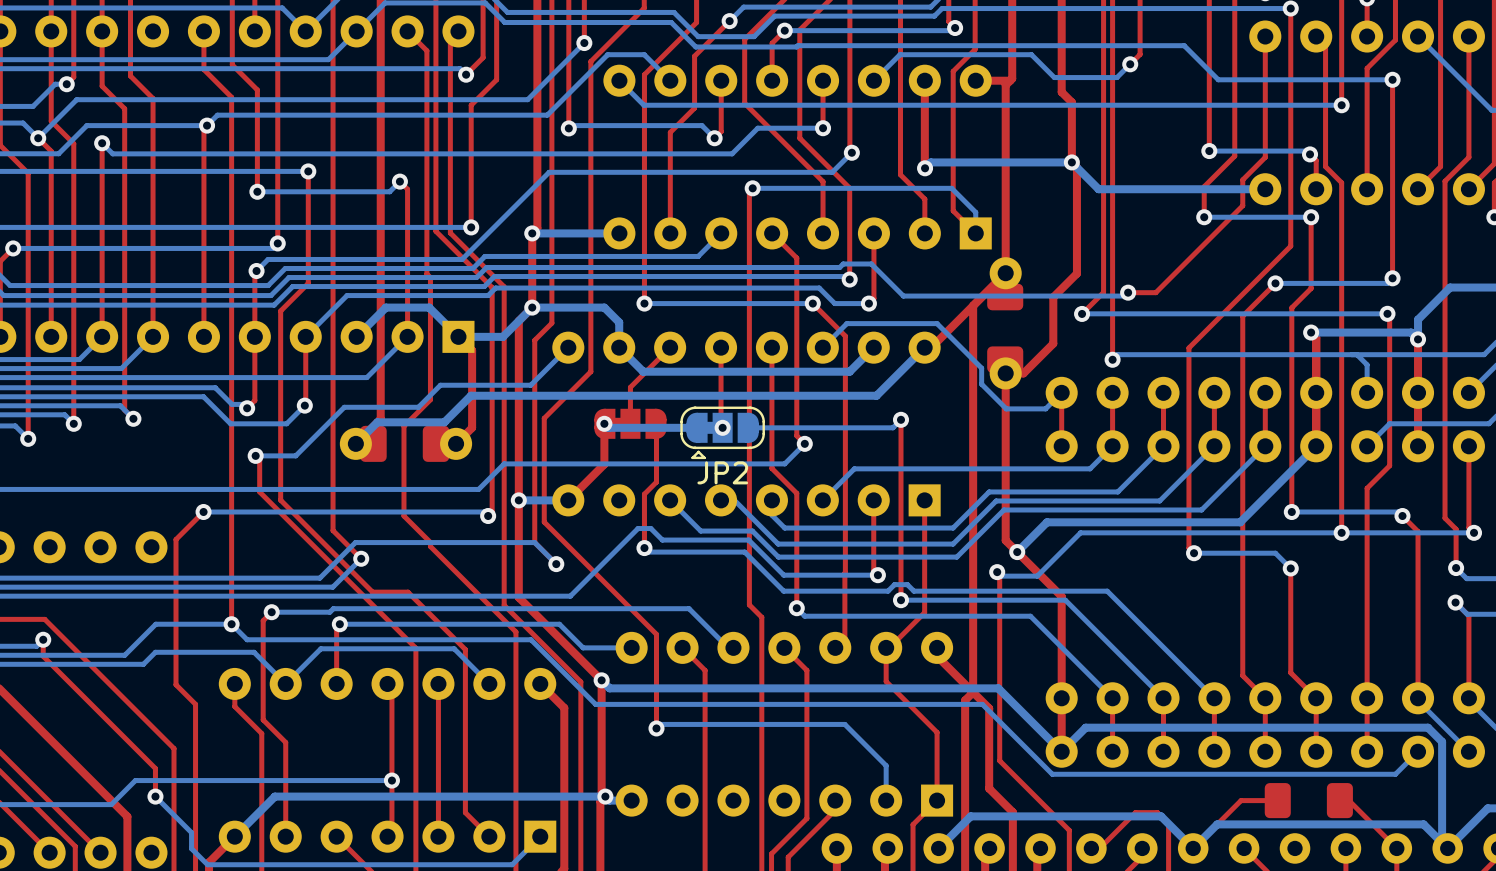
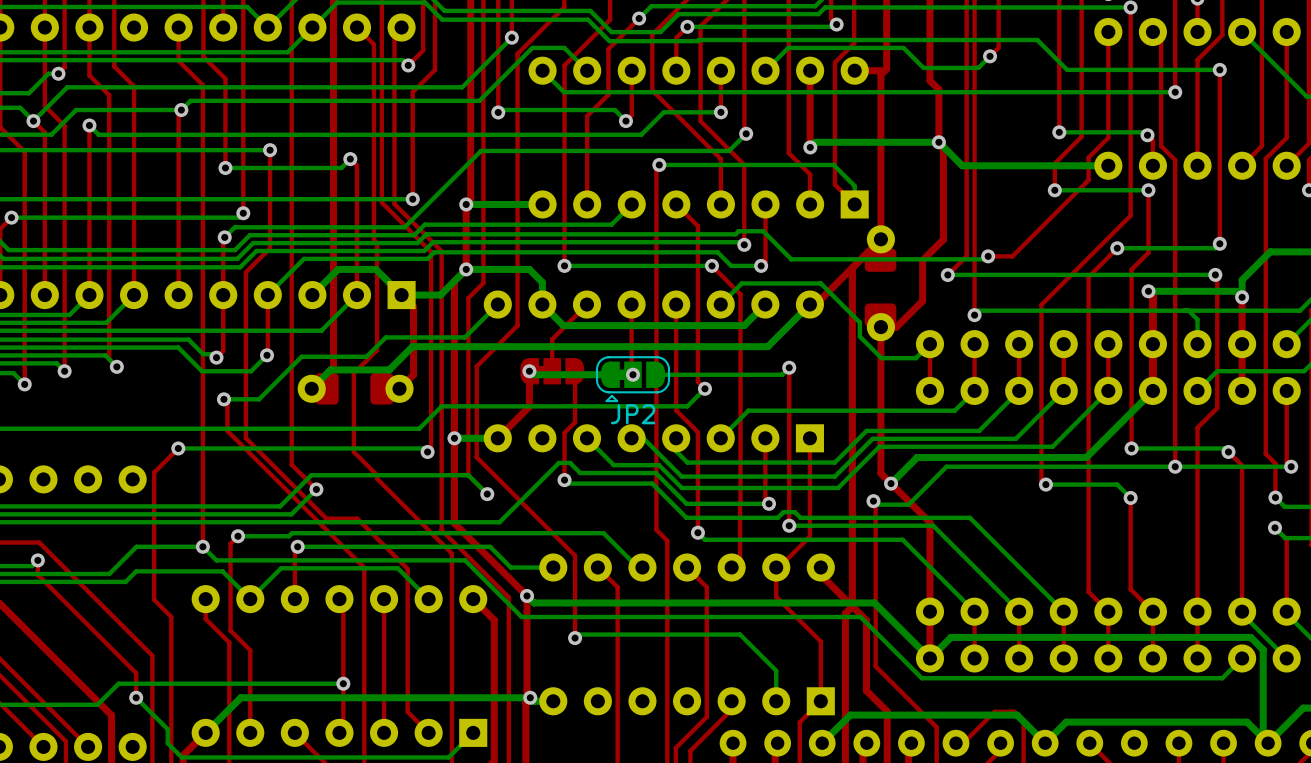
top track: (1277, 800) (1241, 800) (1193, 848) -> none
part: (1308, 800) -> none
top track: (1339, 800) (1348, 800) (1396, 848) -> none

